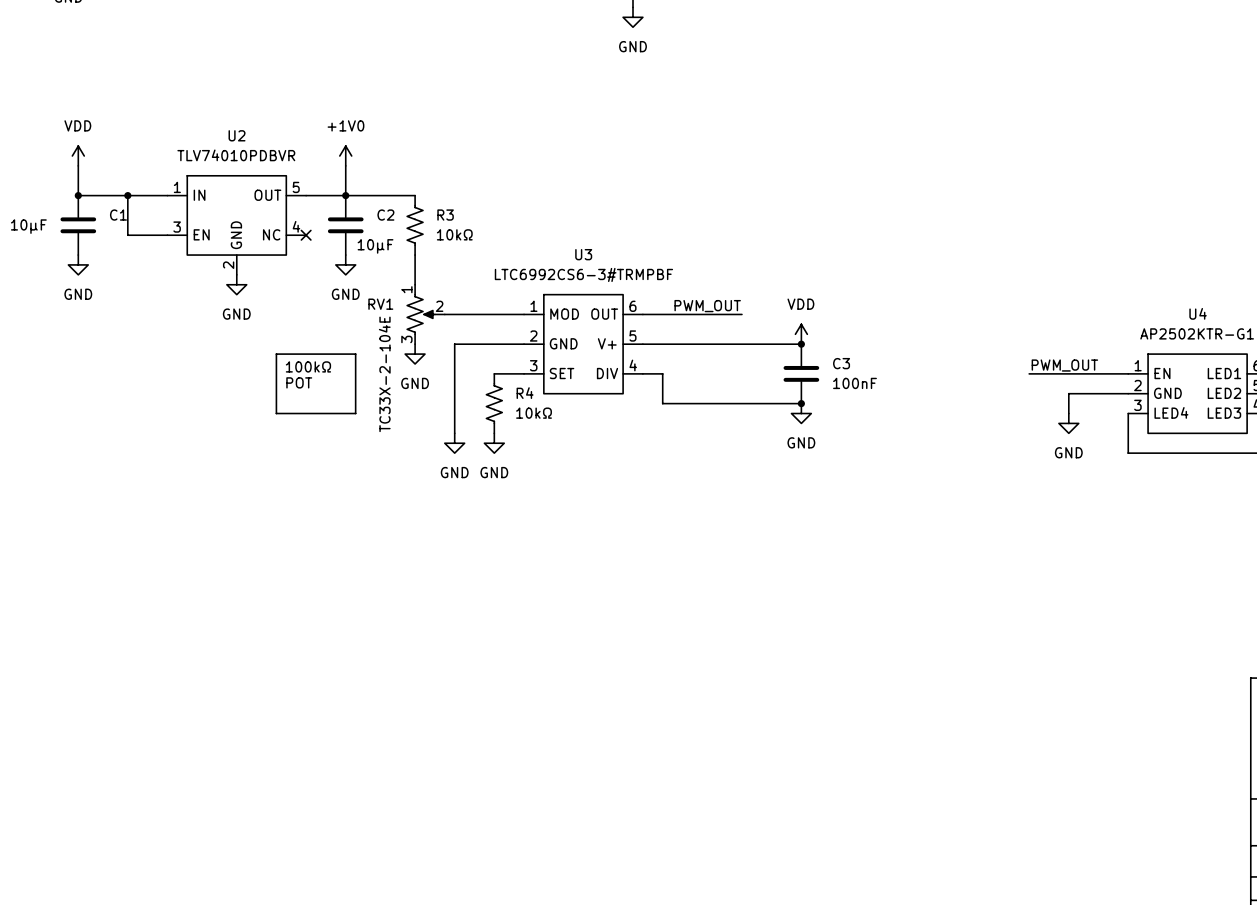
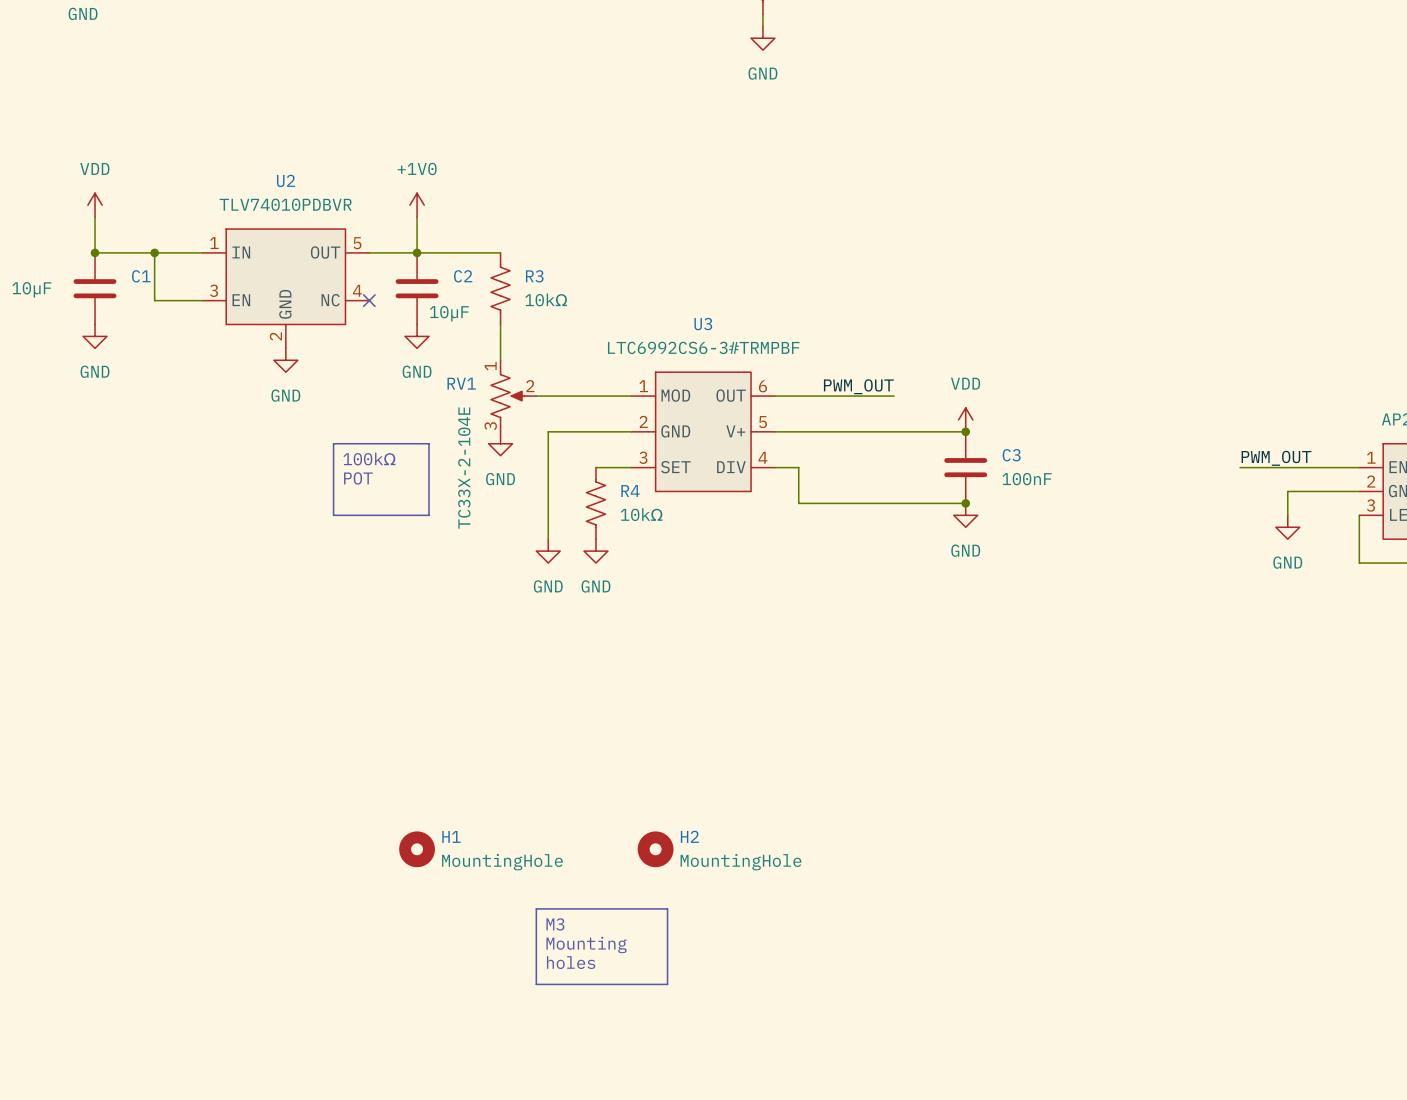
H1: none -> MountingHole (417, 849)
H2: none -> MountingHole (655, 849)
line: none -> (536, 908) (667, 908) (667, 984) (536, 984) (536, 908)
text: none -> M3 (555, 924)
text: none -> Mounting (586, 945)
text: none -> holes (571, 962)

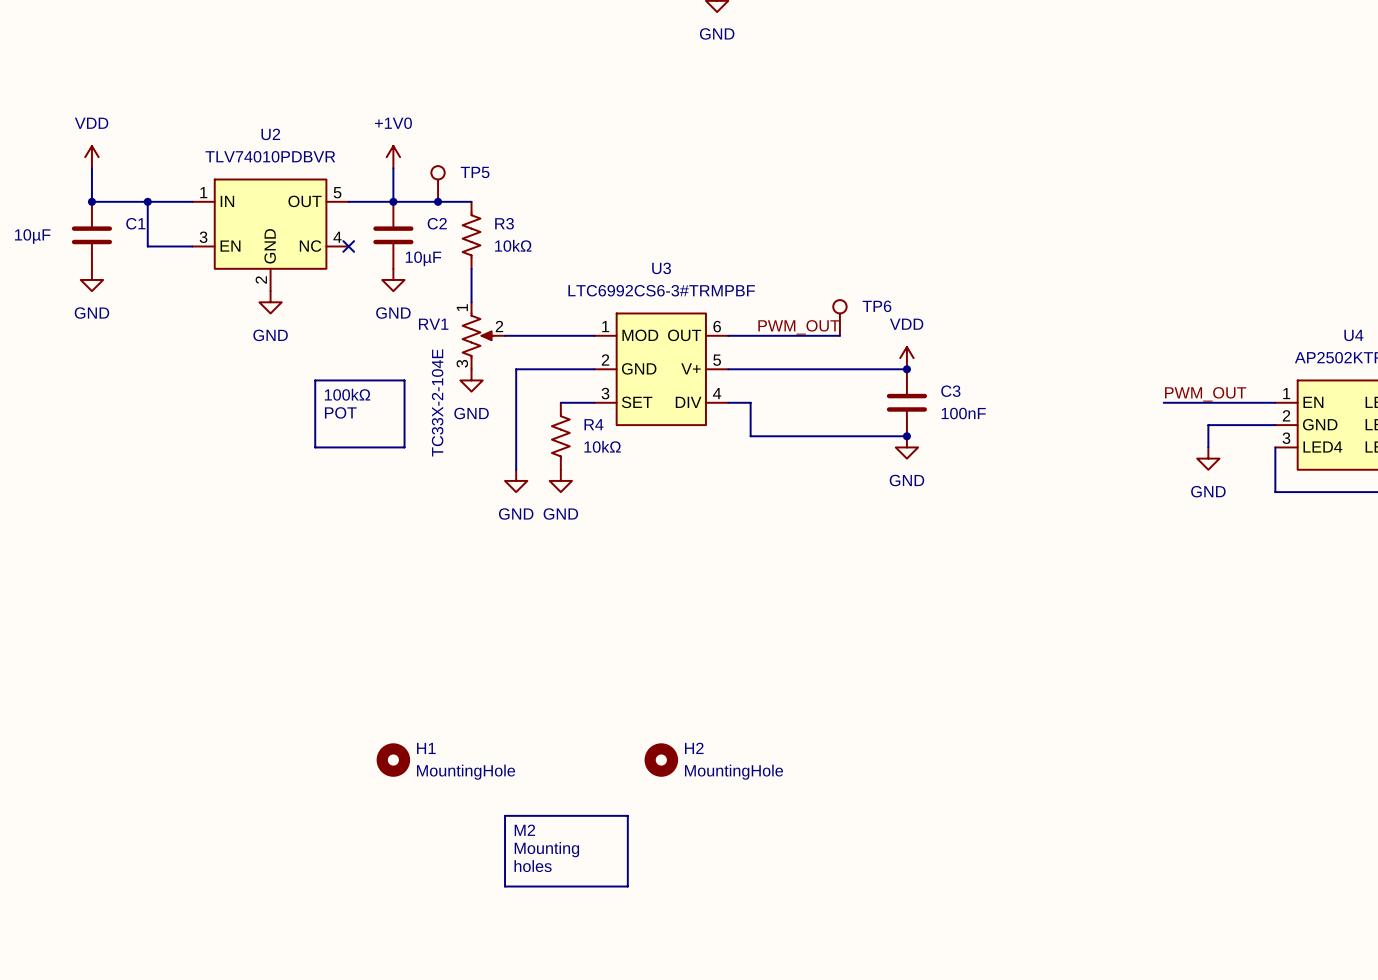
TP5: none -> (438, 183)
junction: none -> (438, 201)
TP6: none -> (839, 317)
H2 position: (655, 849) -> (661, 760)
text: M3 (555, 924) -> M2 (524, 830)

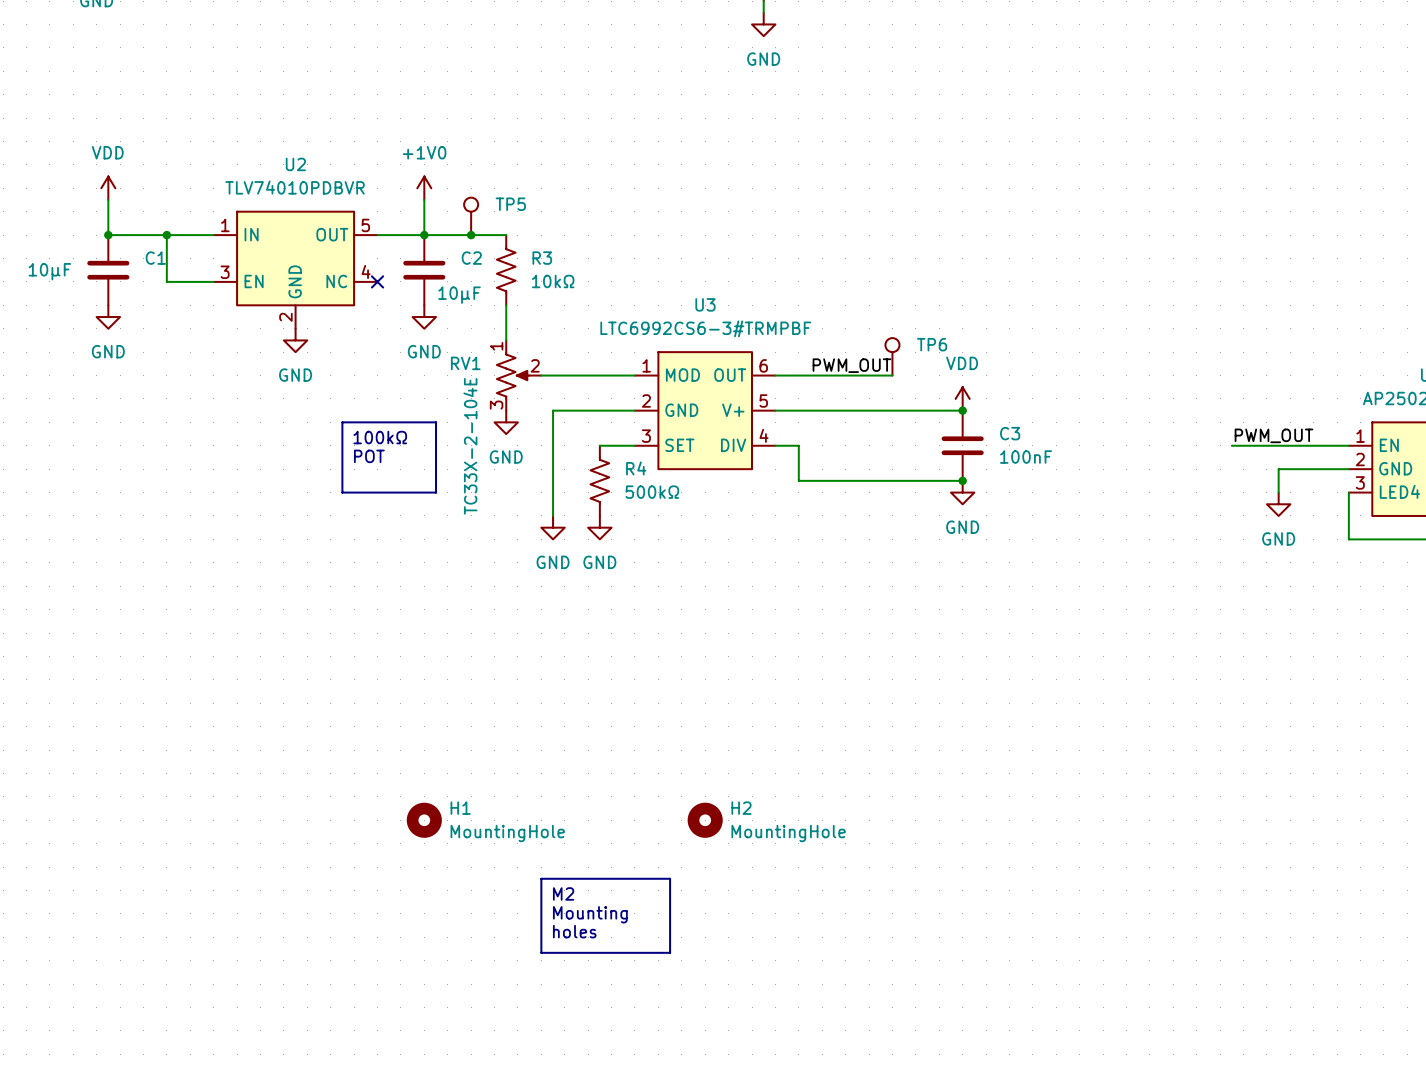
R4 value: 10kΩ (602, 446) -> 500kΩ (652, 492)

